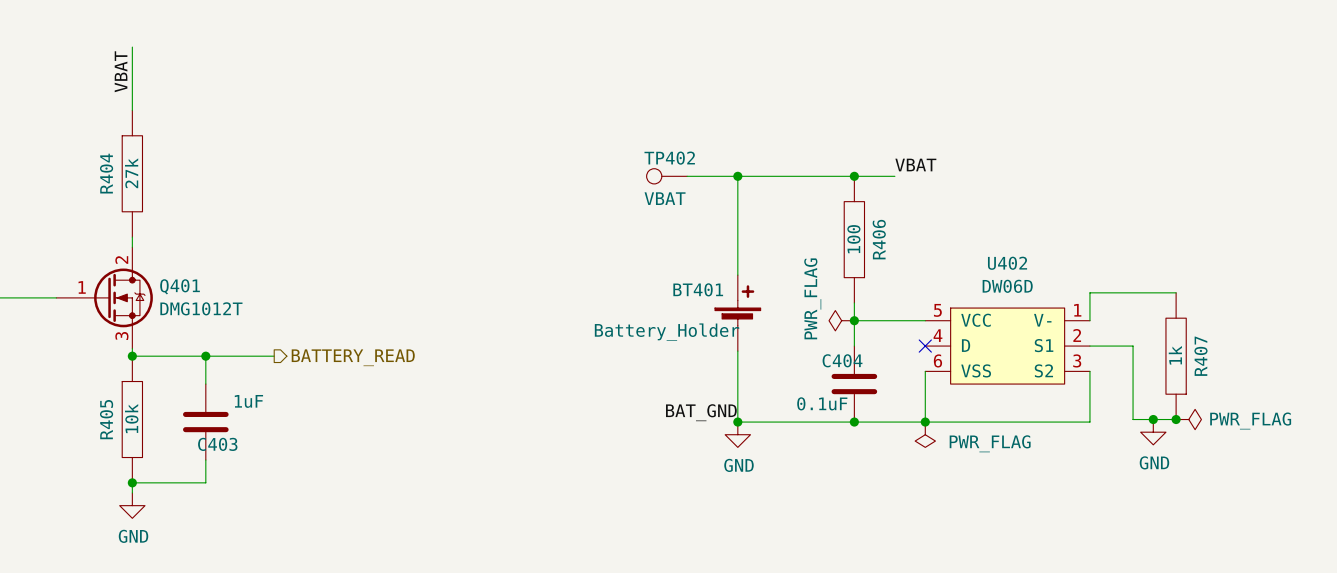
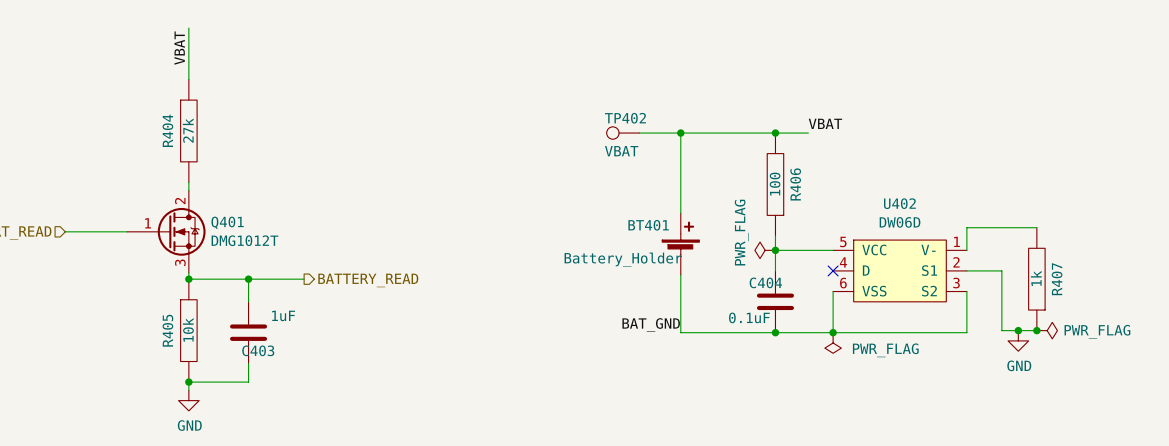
junction: (737, 422) -> none
power symbol: GND (737, 434) -> none

